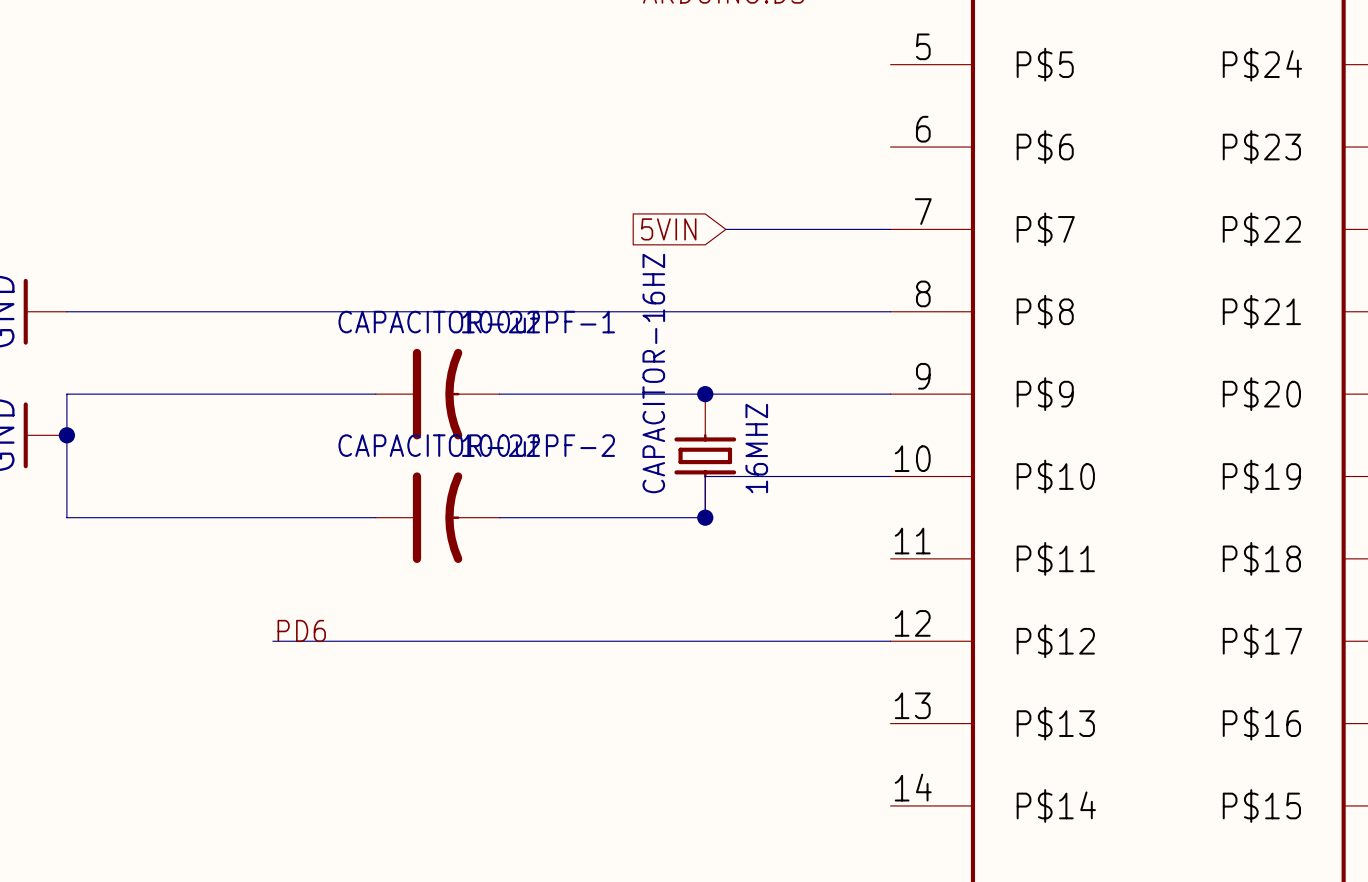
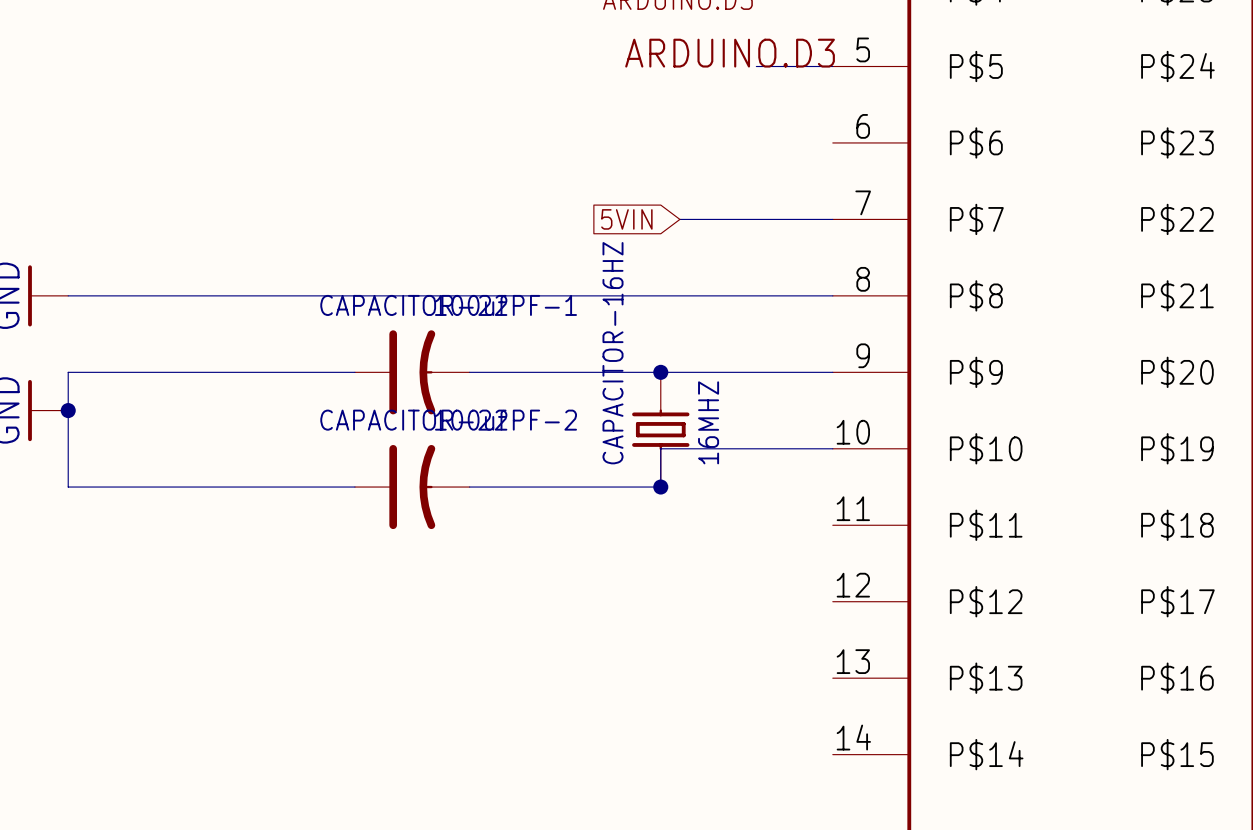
label: none -> ARDUINO.D3 (730, 53)
wire: none -> (756, 66) (832, 66)
label: PD6 (301, 630) -> none
wire: (272, 641) (890, 641) -> none

